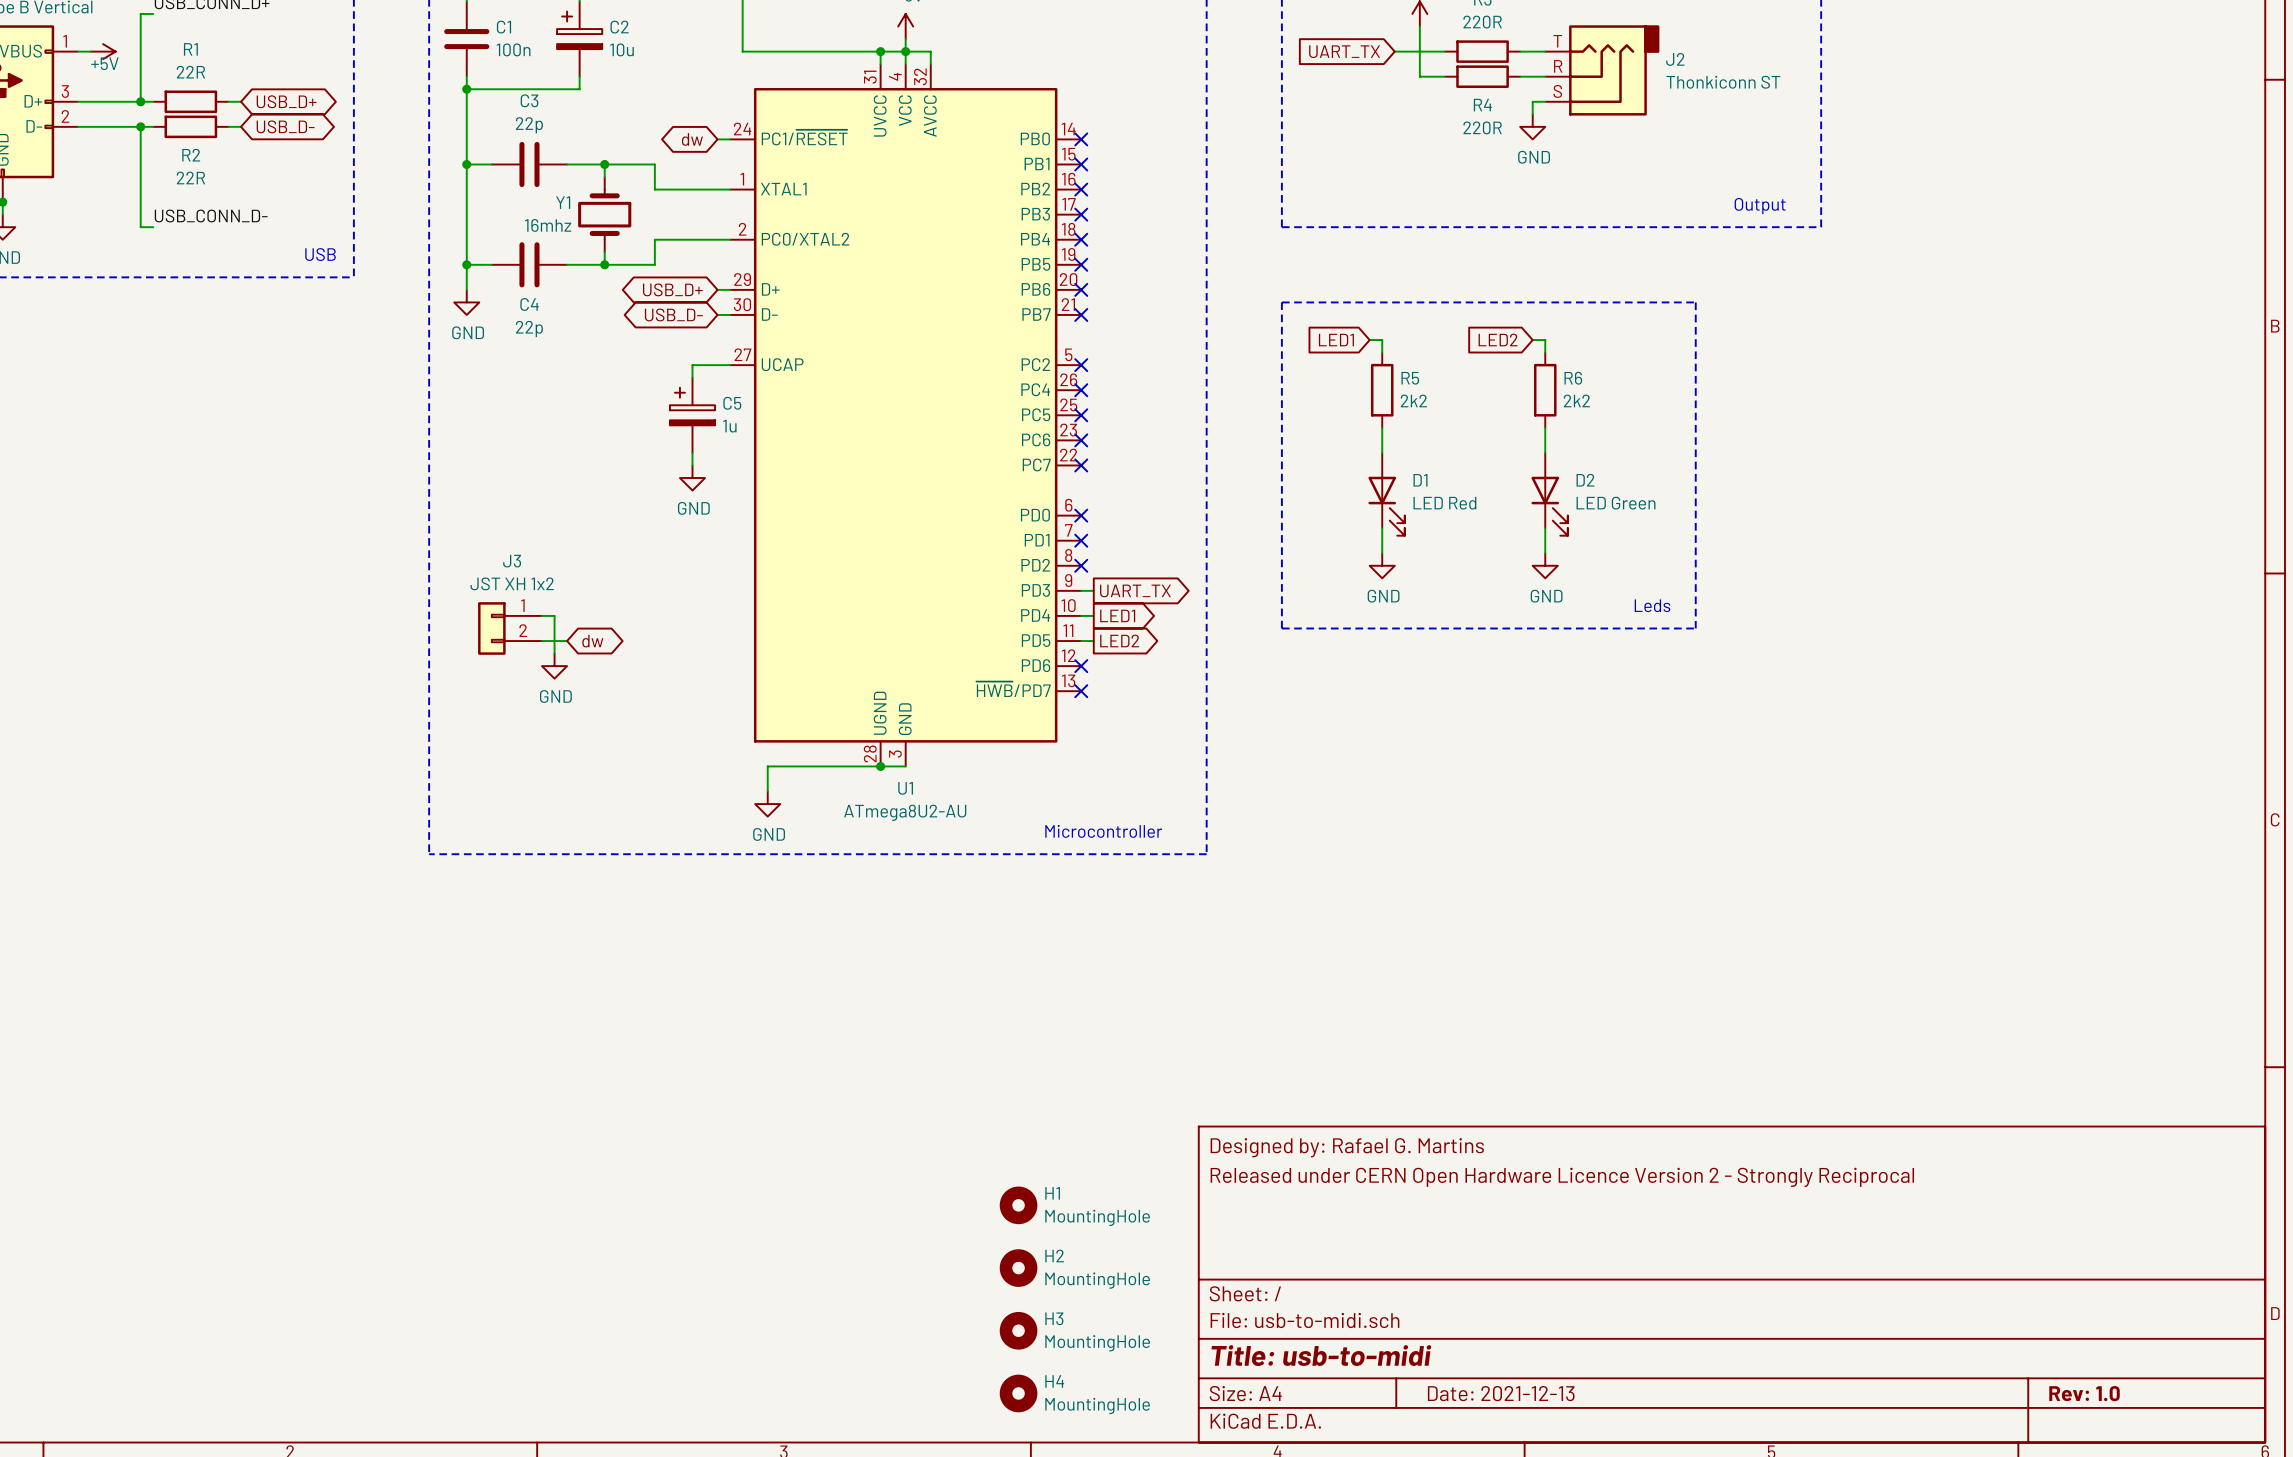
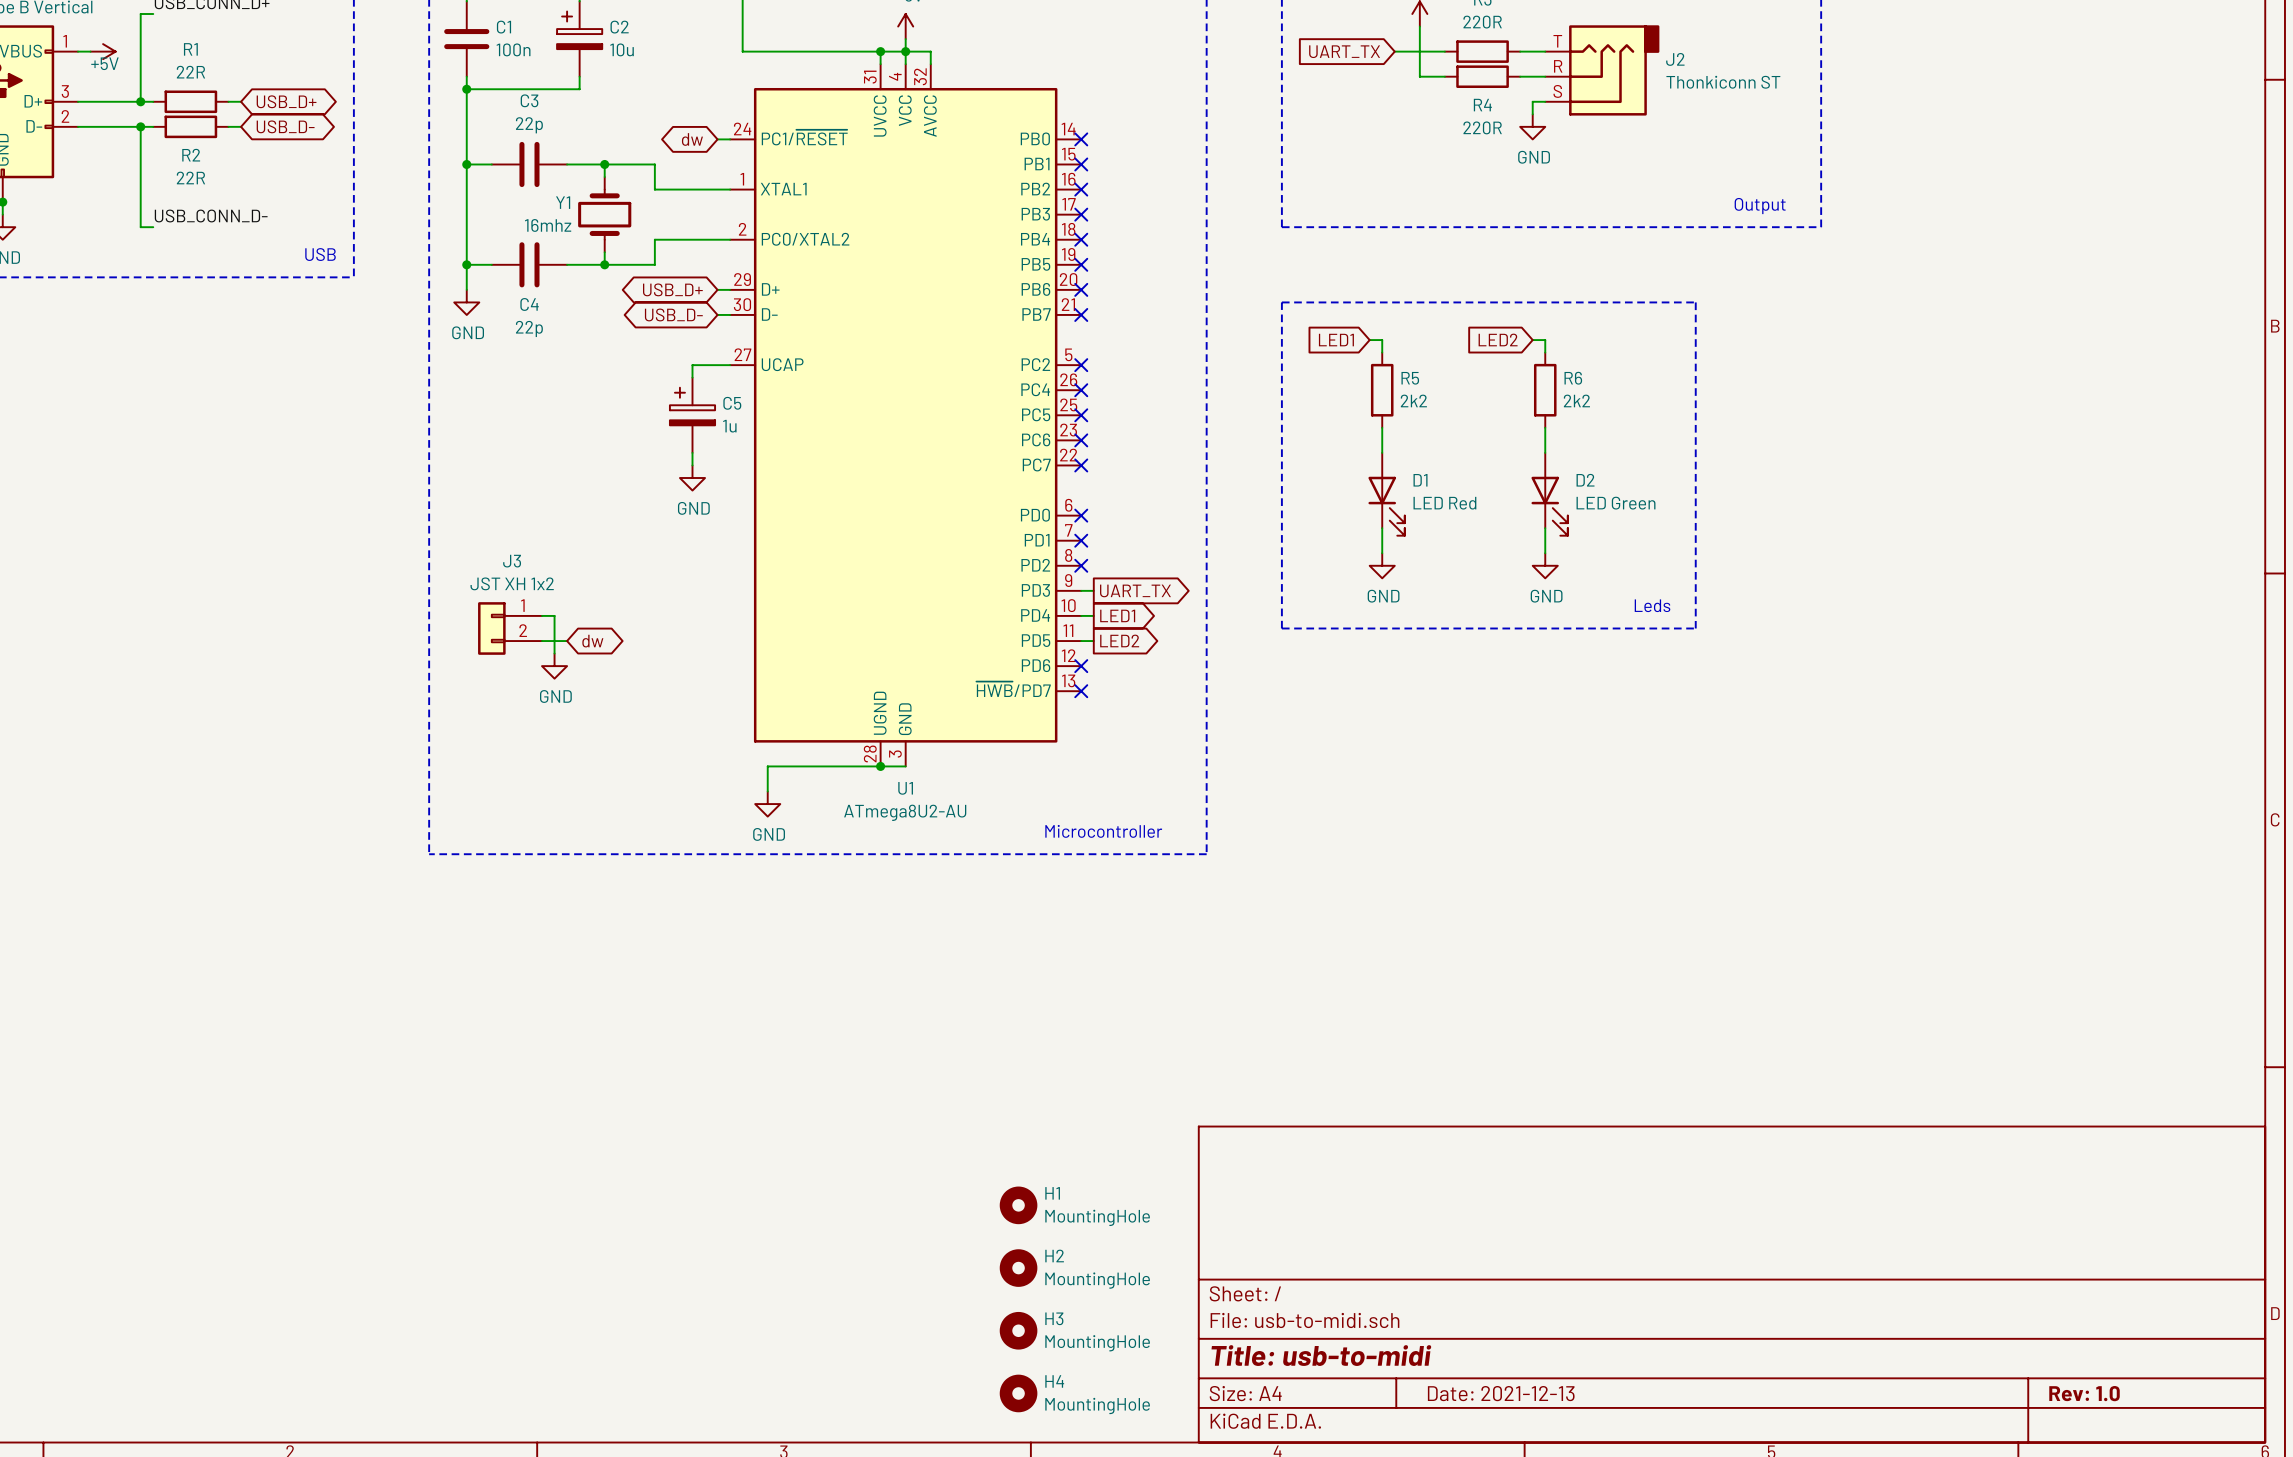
title block: Designed by: Rafael G. Martins (1347, 1147) -> none
title block: Released under CERN Open Hardware Licence Version 2 - Strongly Reciprocal (1562, 1177) -> none

